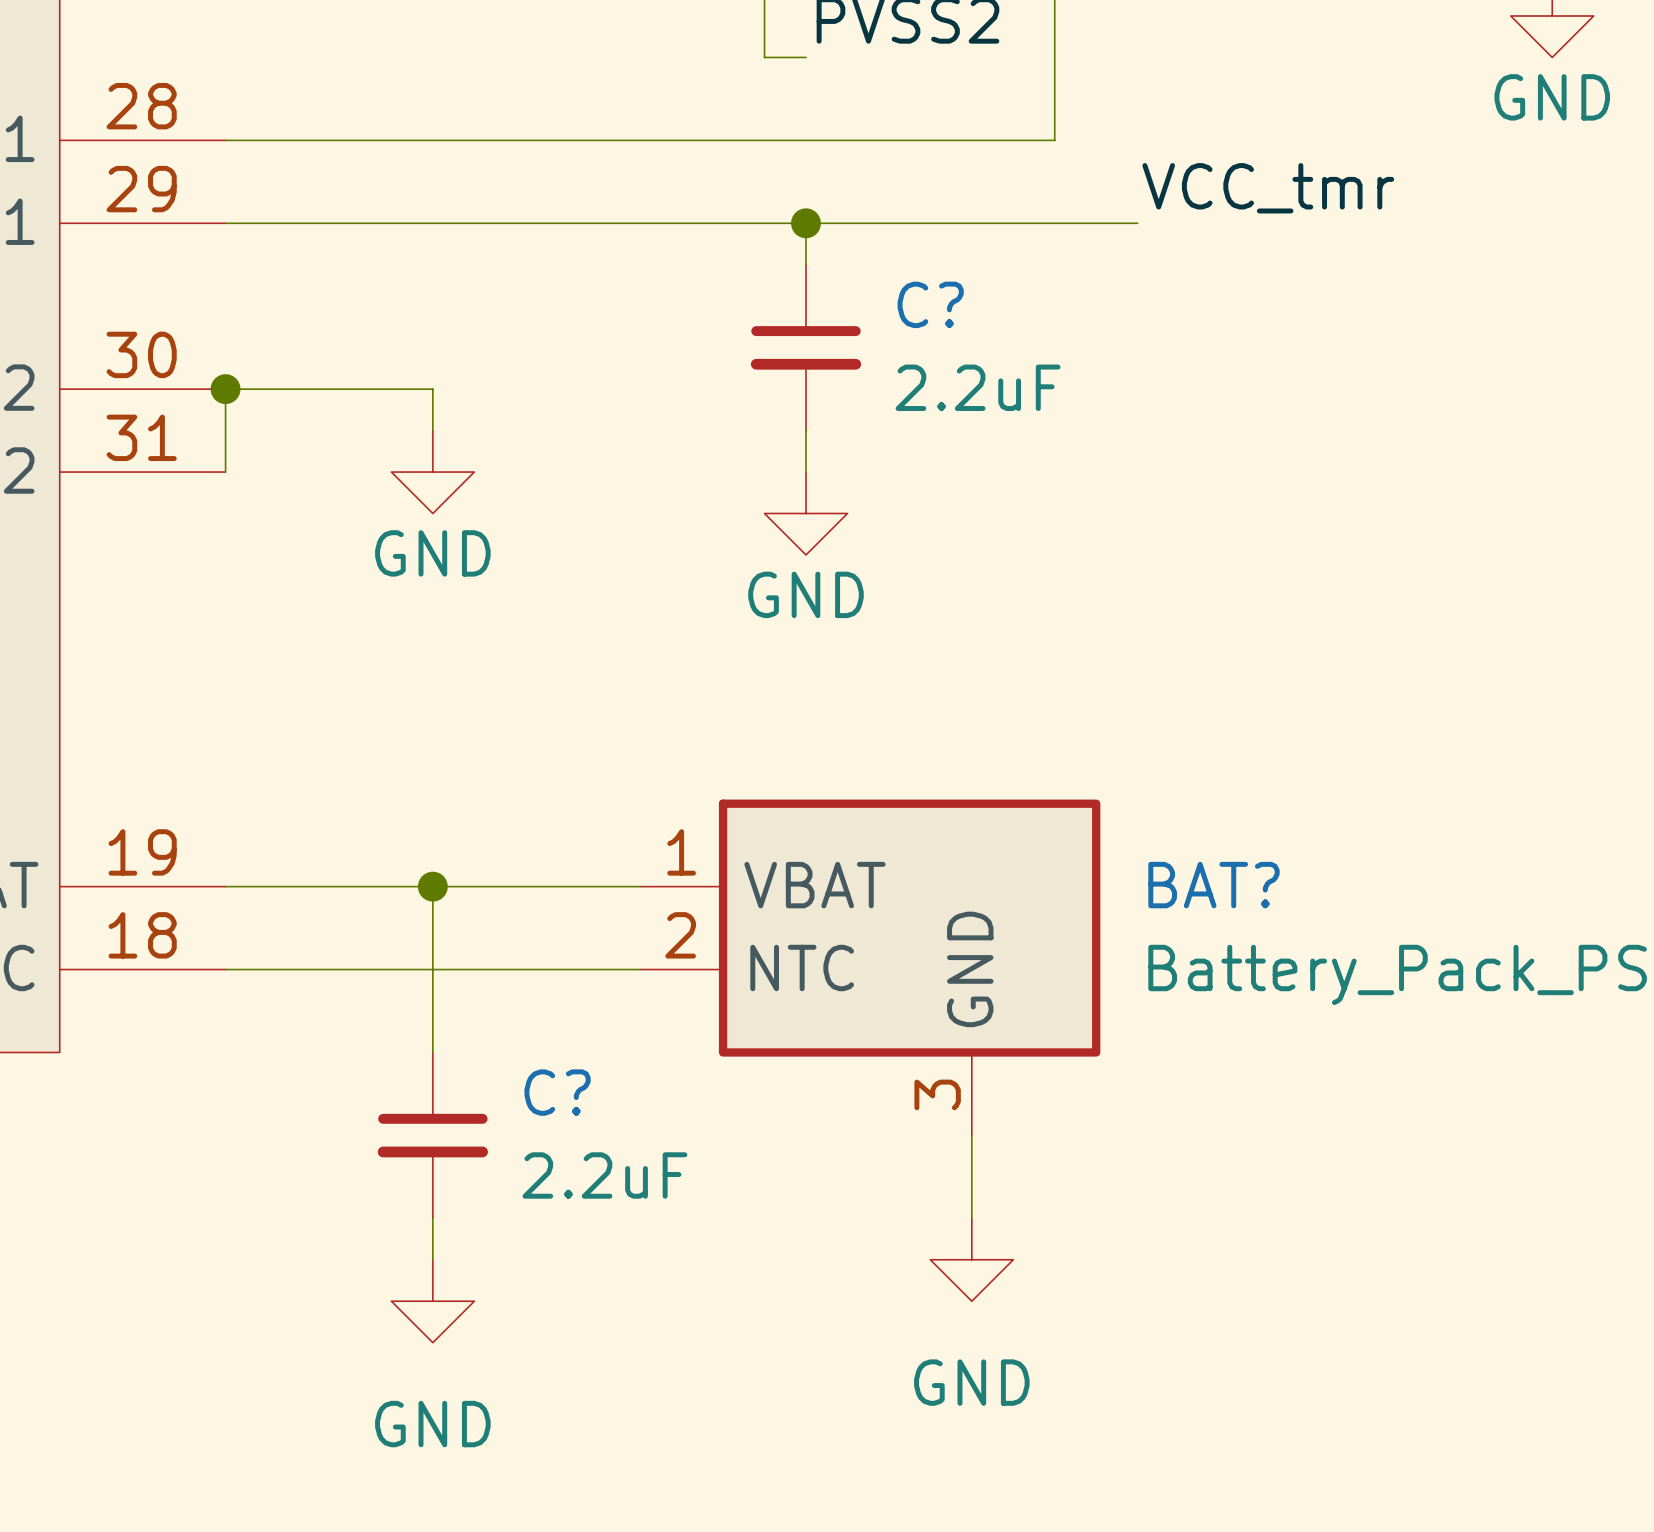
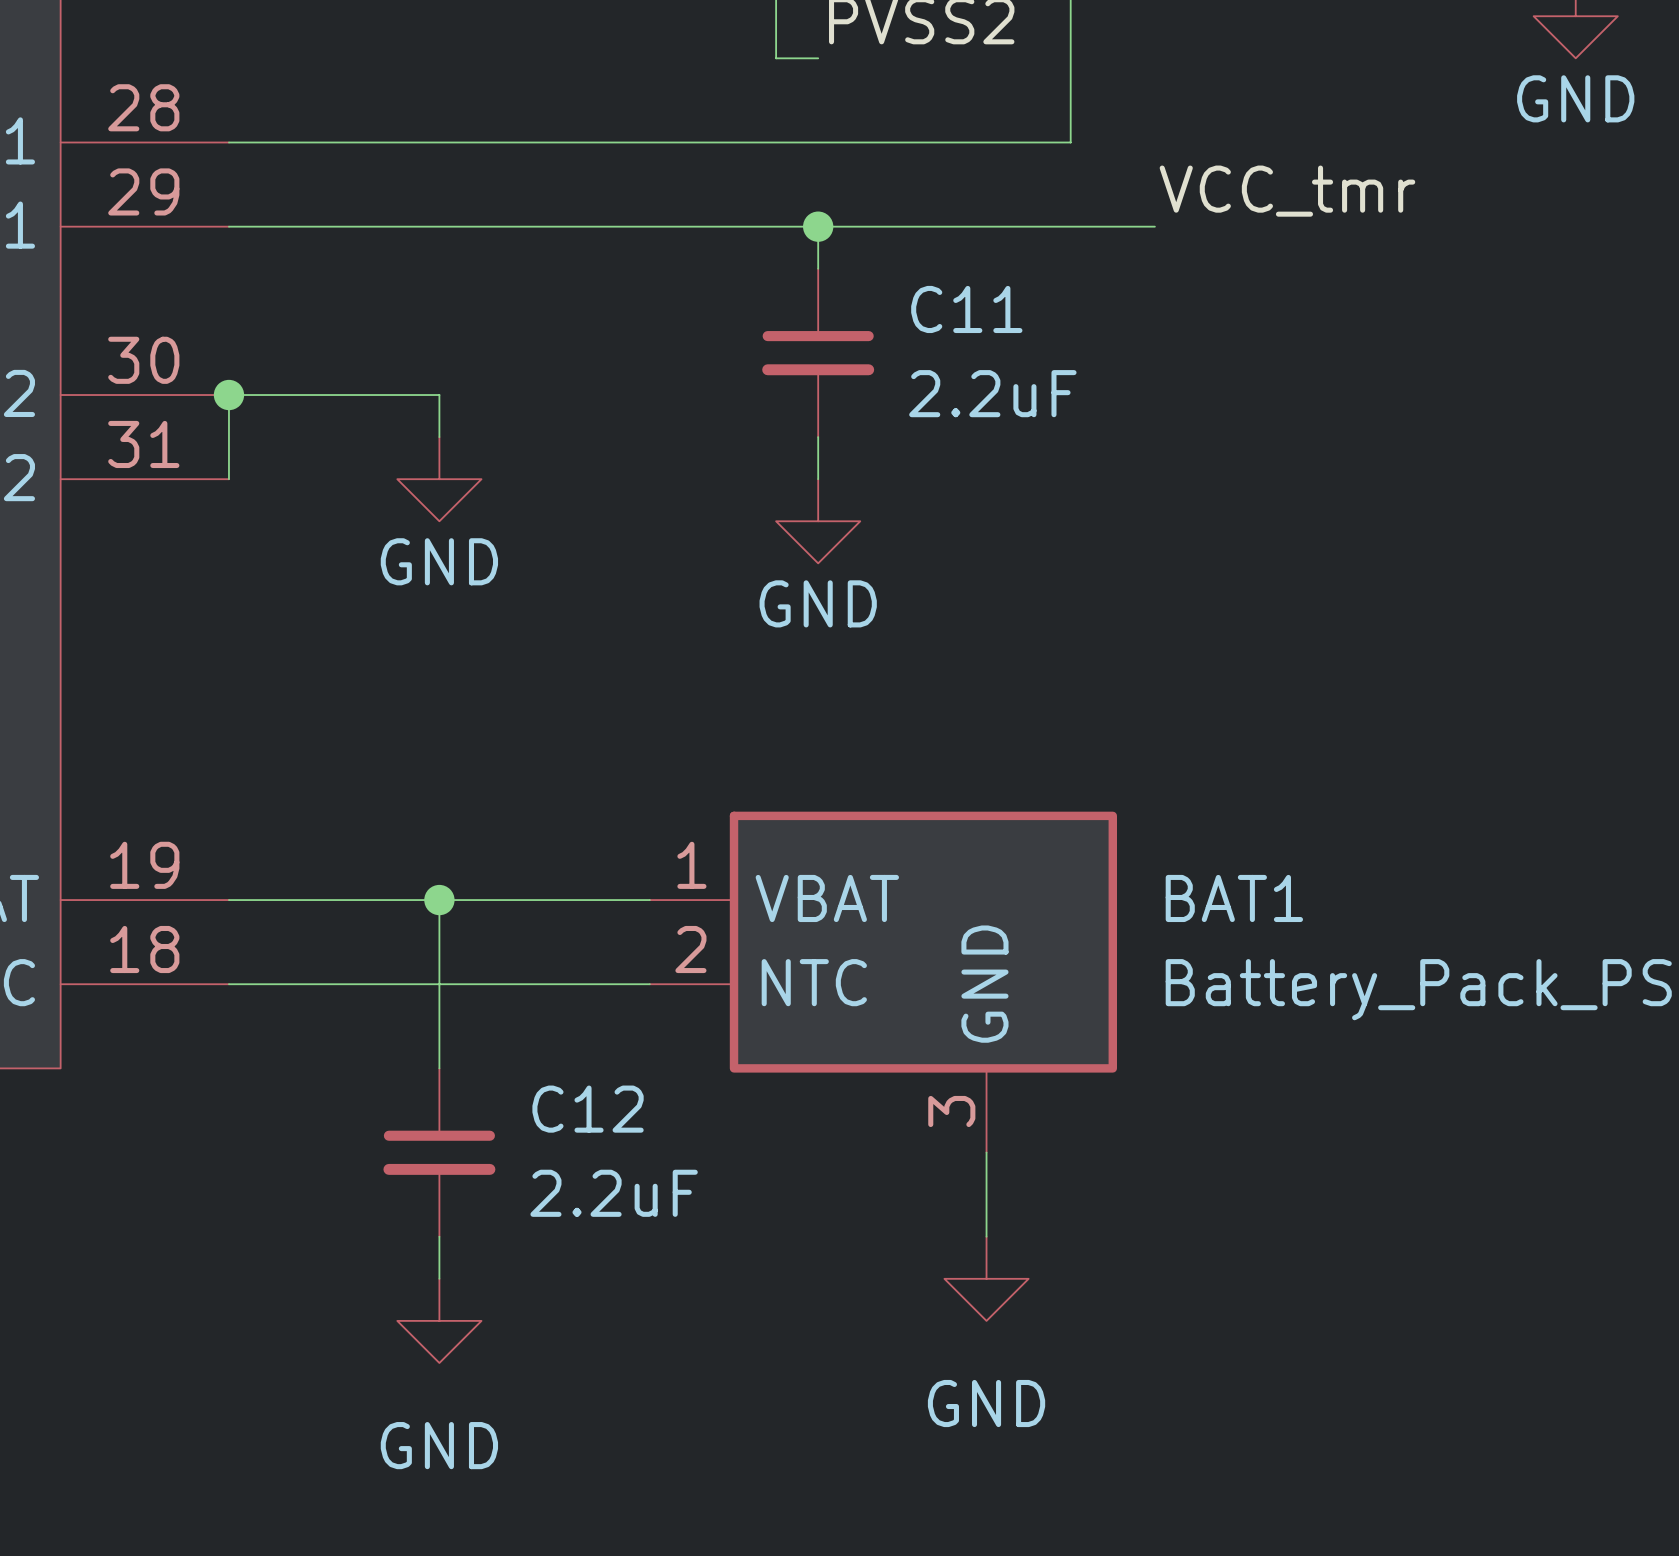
C? name: C? (930, 304) -> C11 (966, 309)
BAT? name: BAT? (1213, 885) -> BAT1 (1234, 898)
C? name: C? (557, 1092) -> C12 (588, 1109)

